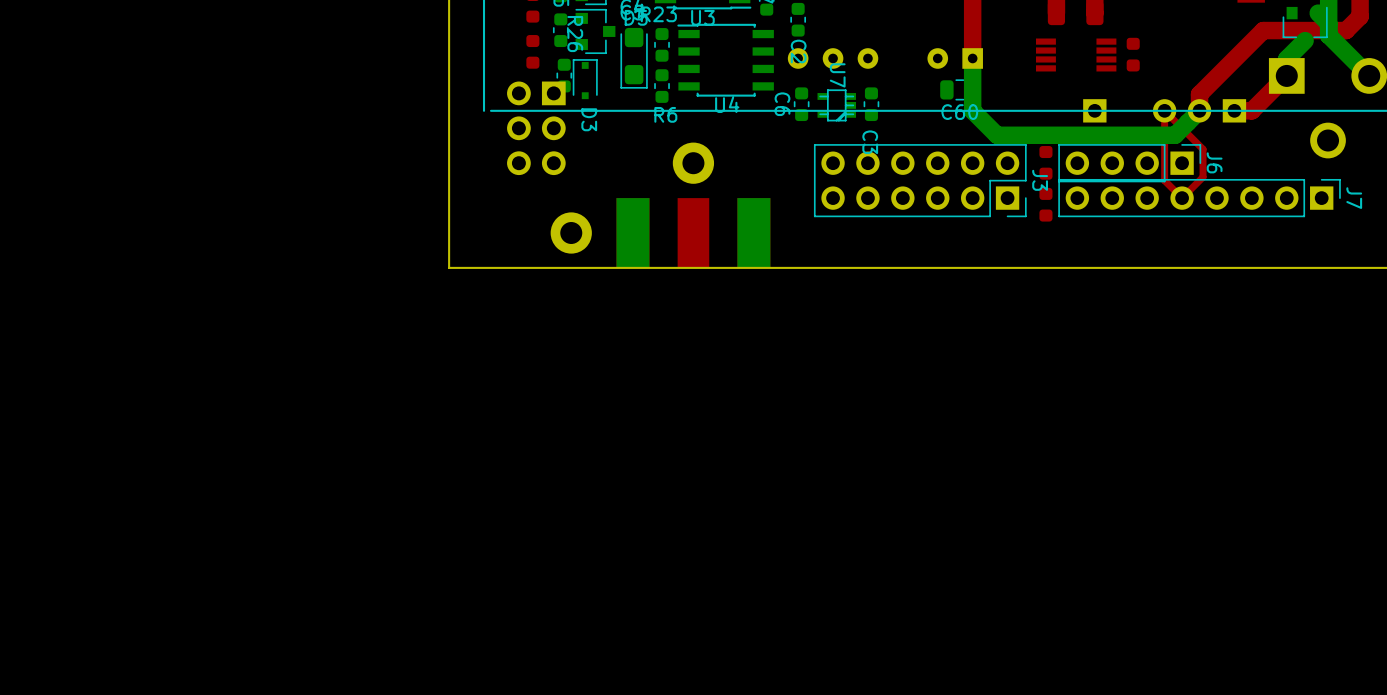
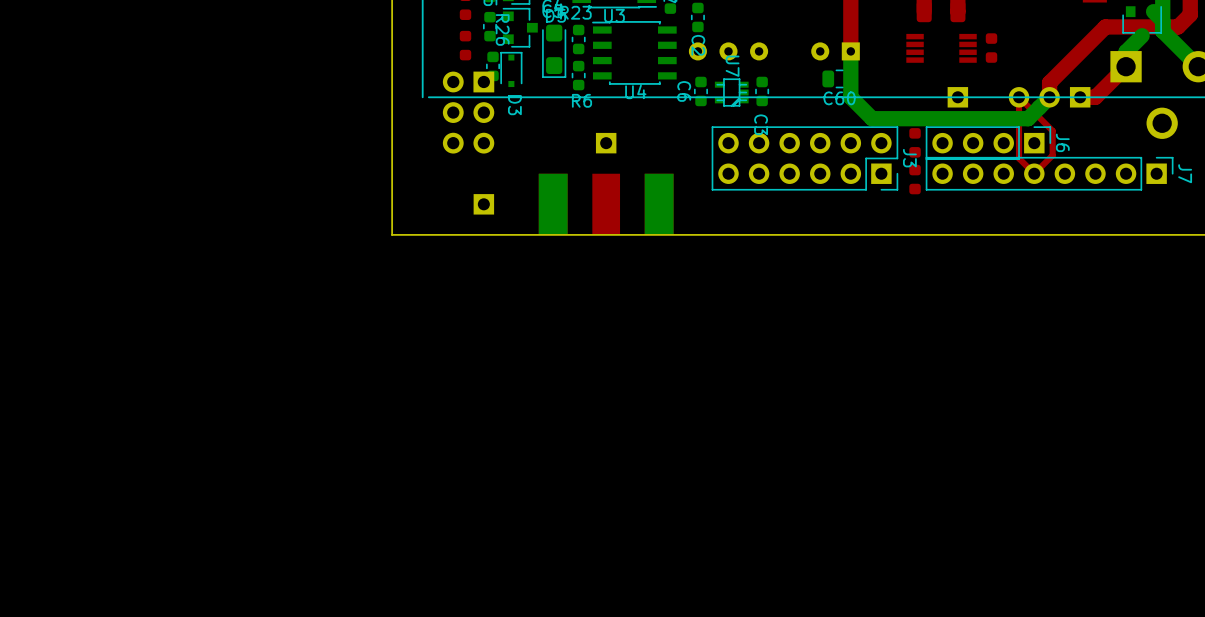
part footprint: [672, 142, 715, 184] -> [595, 132, 617, 154]
part: none -> (483, 204)
part: (571, 233) -> none

